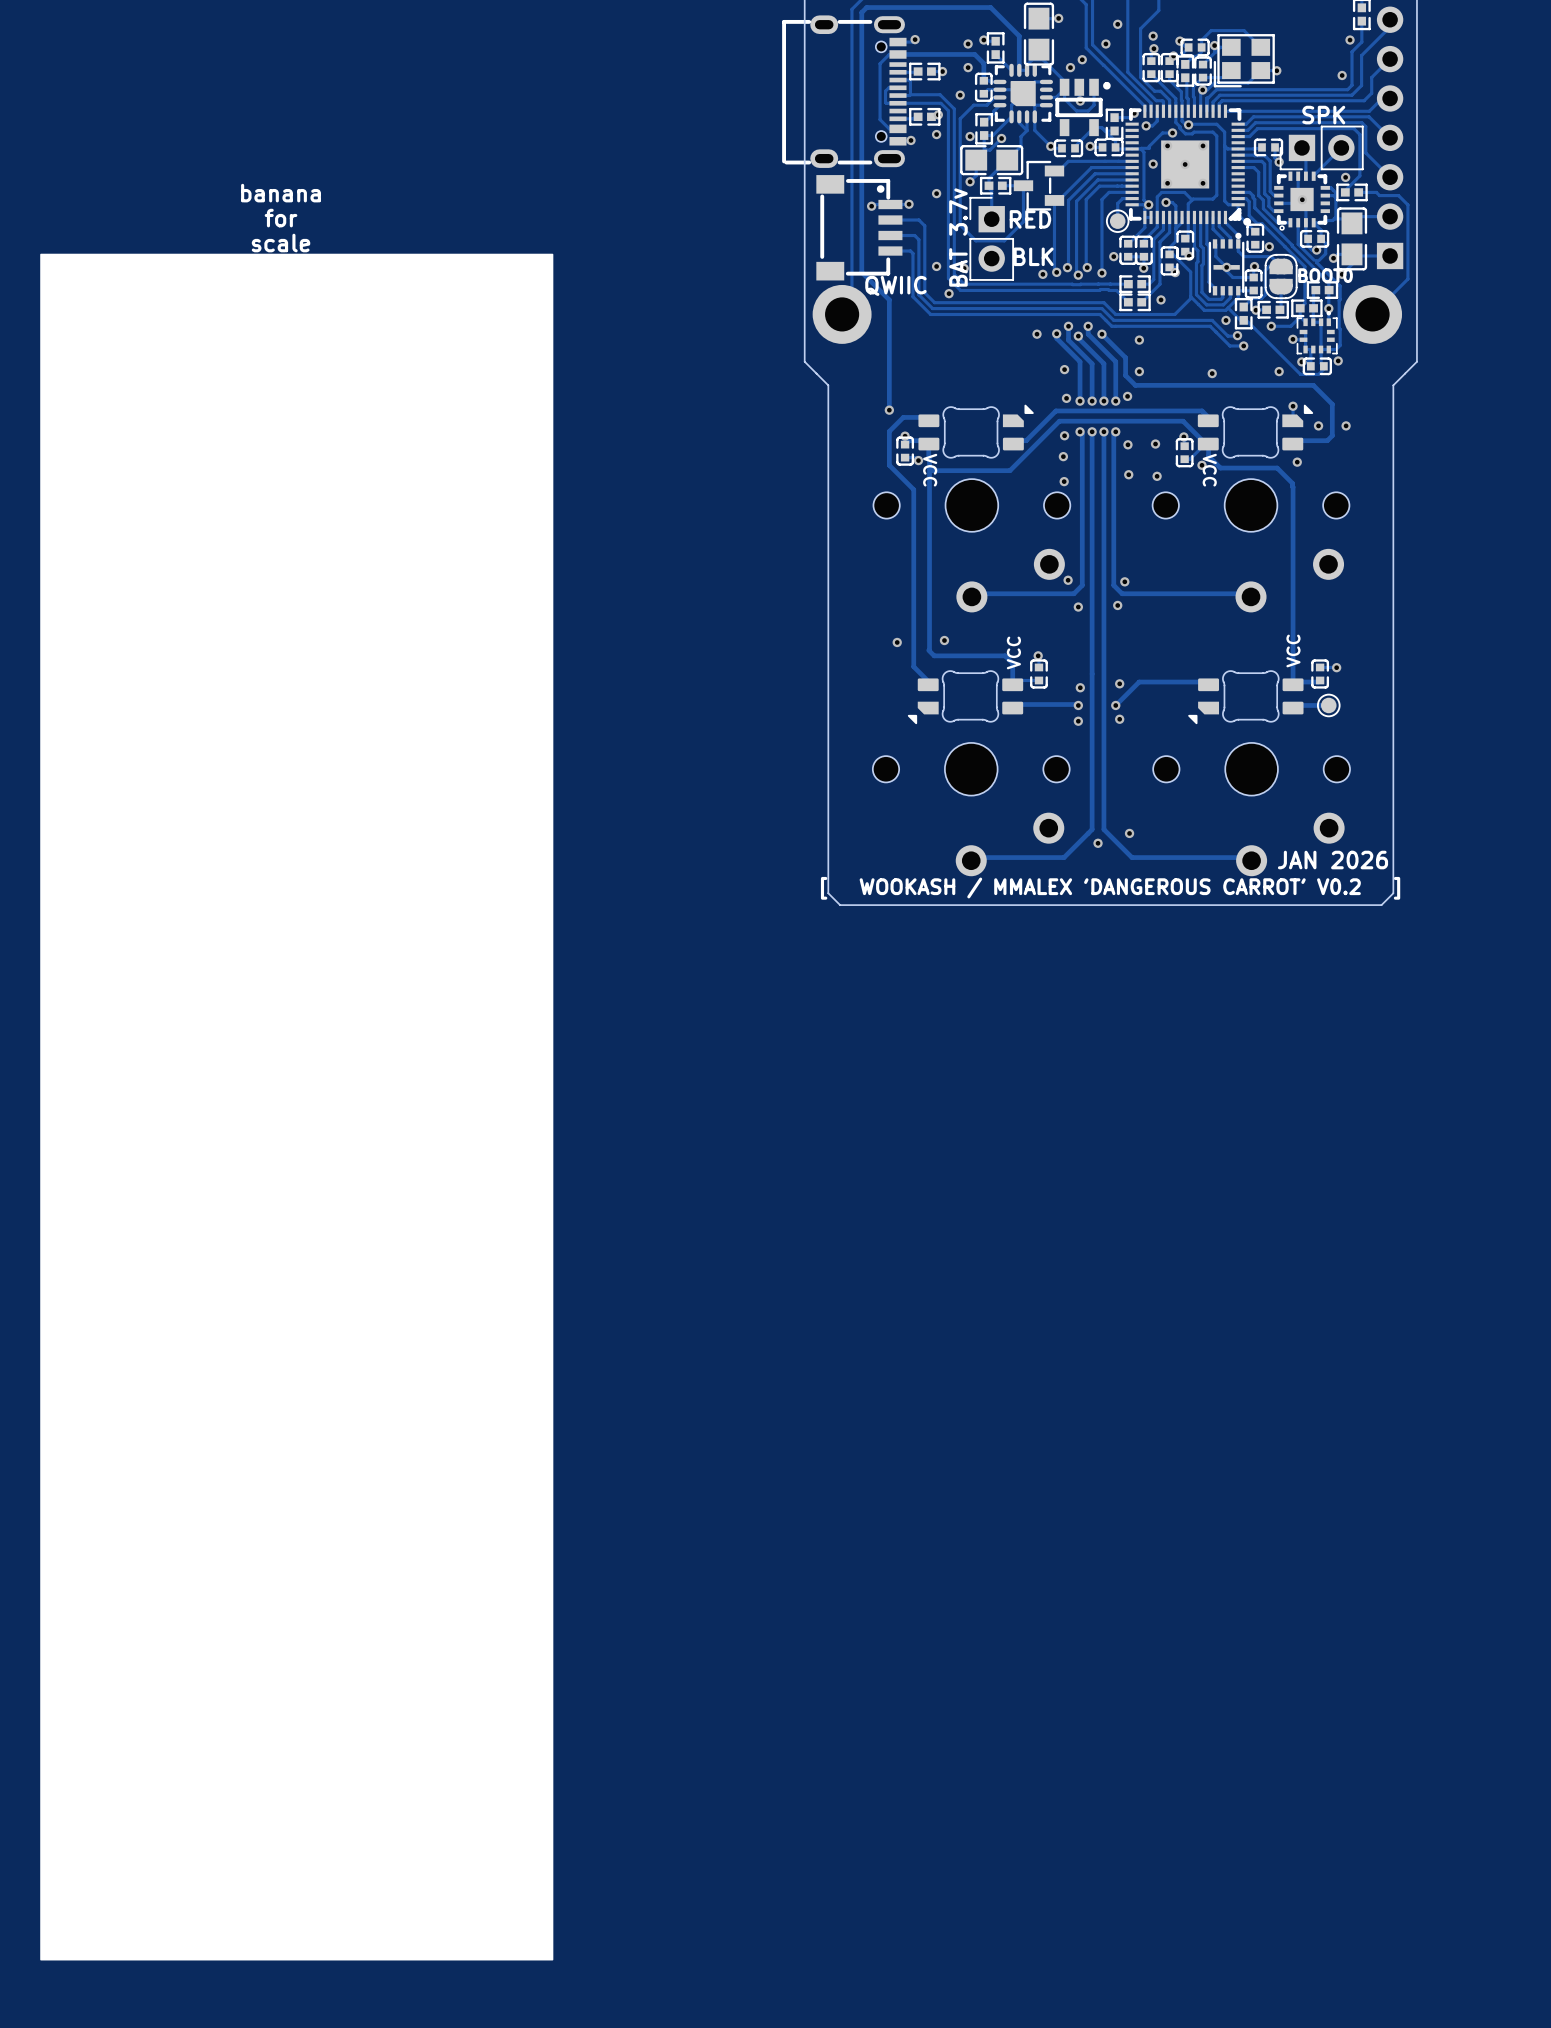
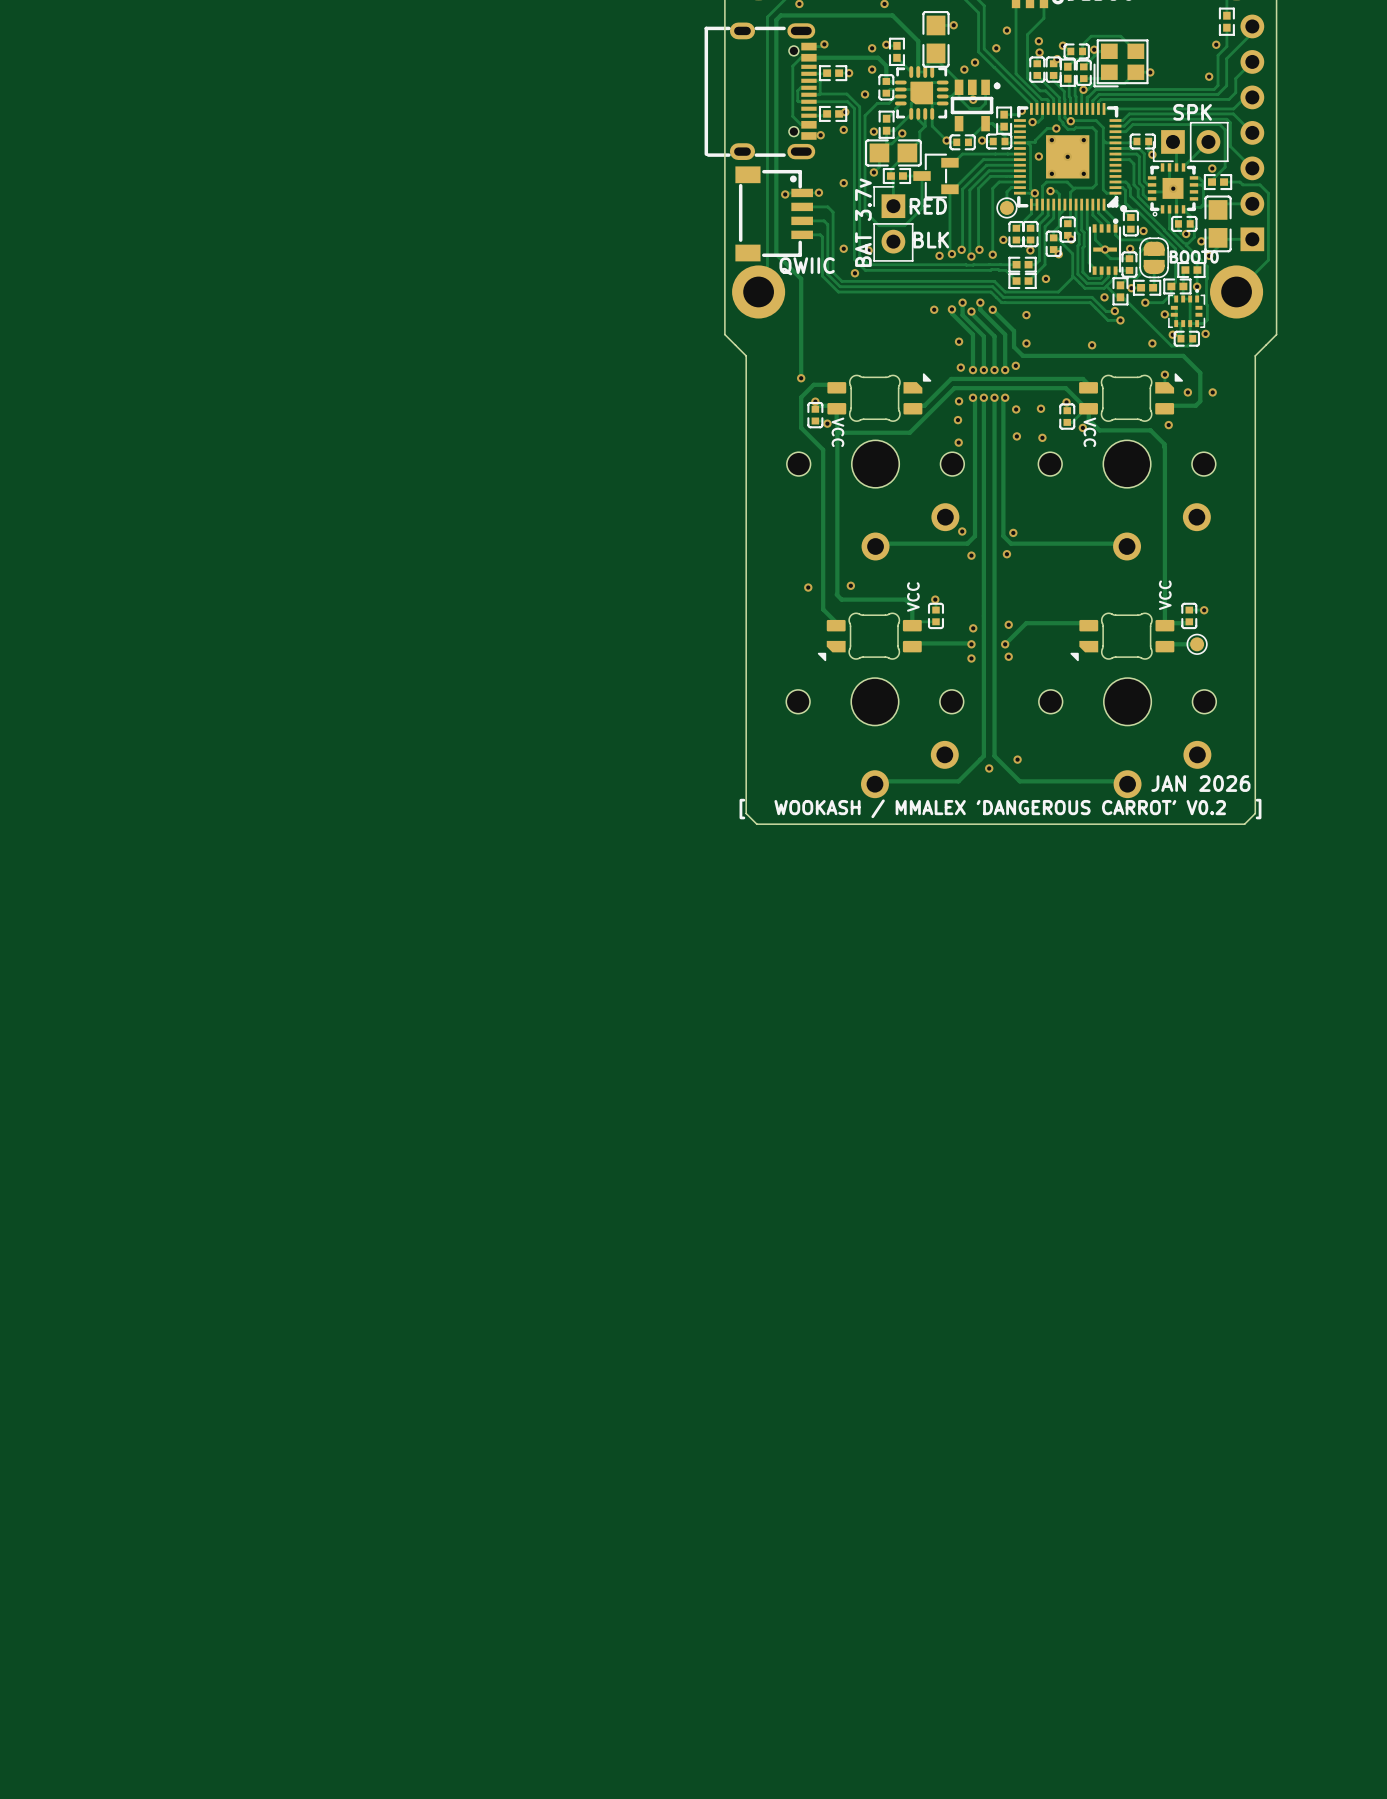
text: banana (281, 193) -> none
text: for (281, 218) -> none
text: scale (281, 243) -> none
drawing: [40, 253, 554, 1961] -> none

